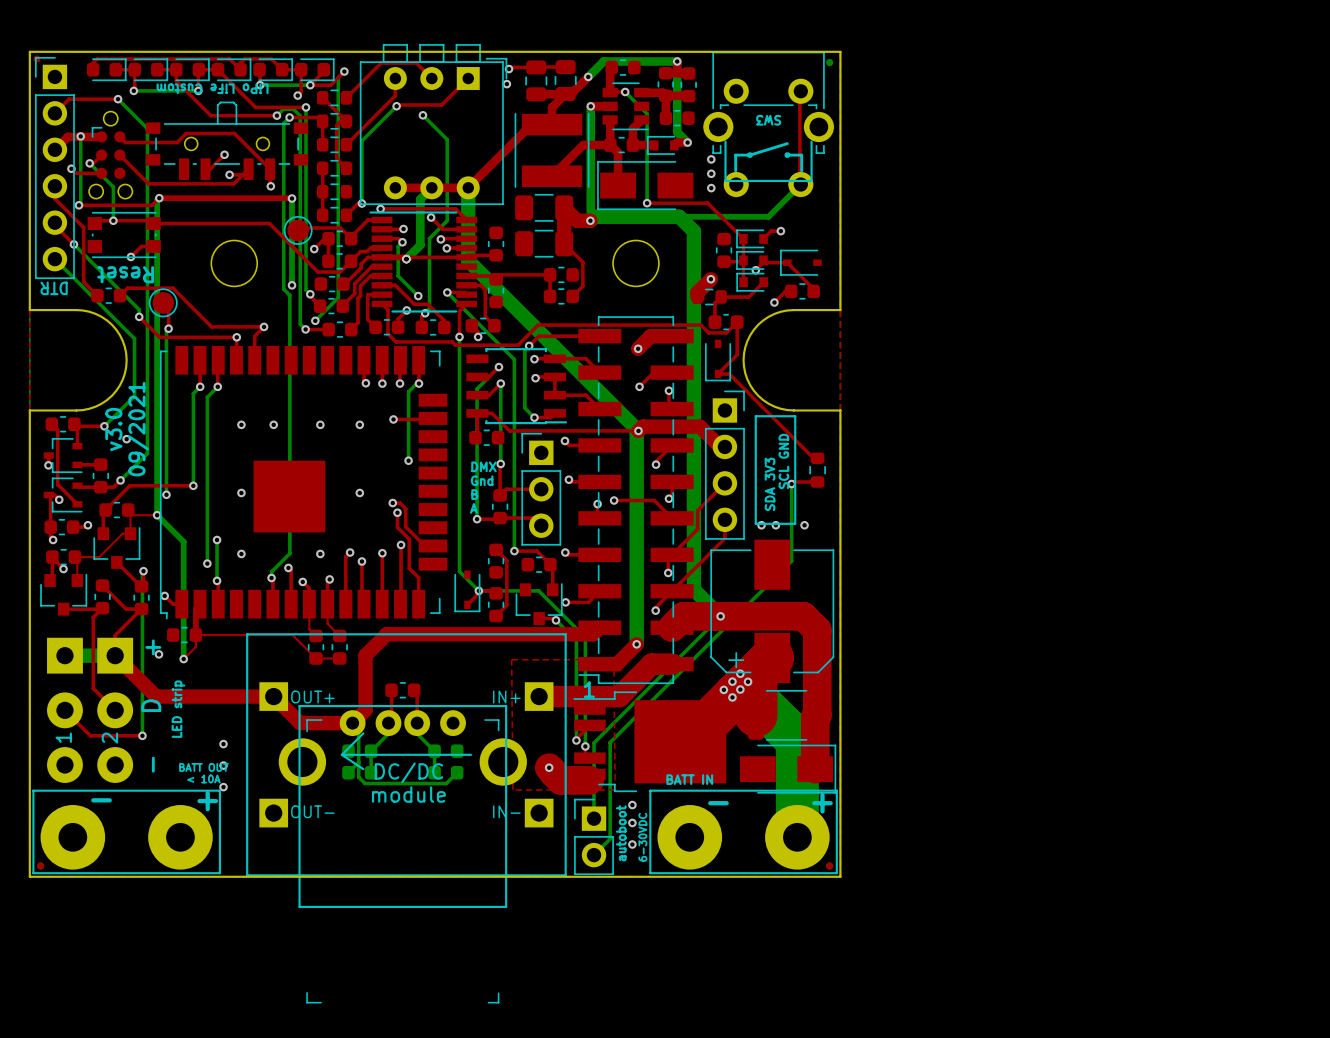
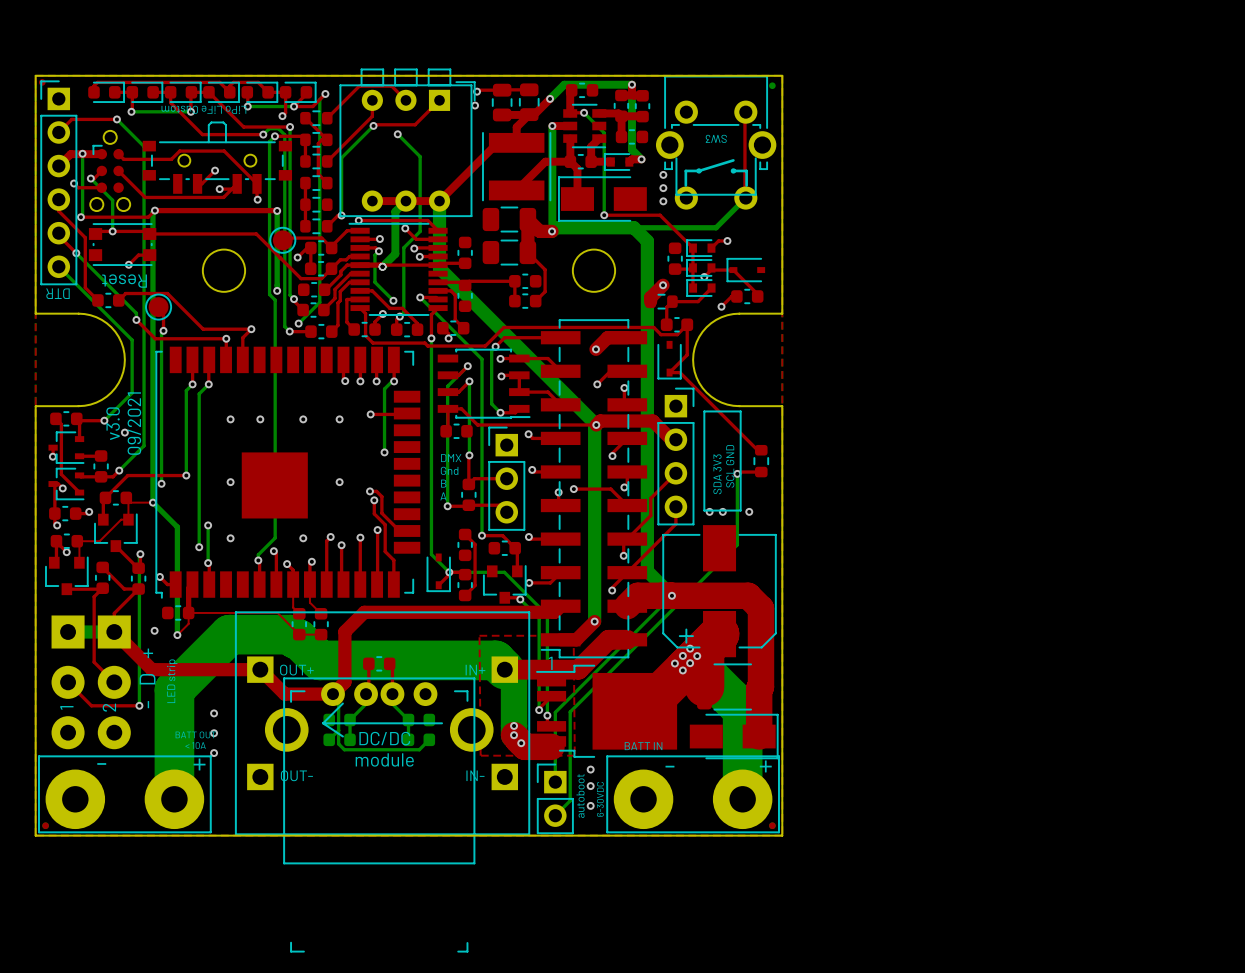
via: none -> (514, 725)
bottom track: none -> (514, 735) (514, 678) (495, 660) (319, 660) (298, 639) (290, 634) (229, 634) (174, 689) (174, 799)
via: none -> (521, 743)

